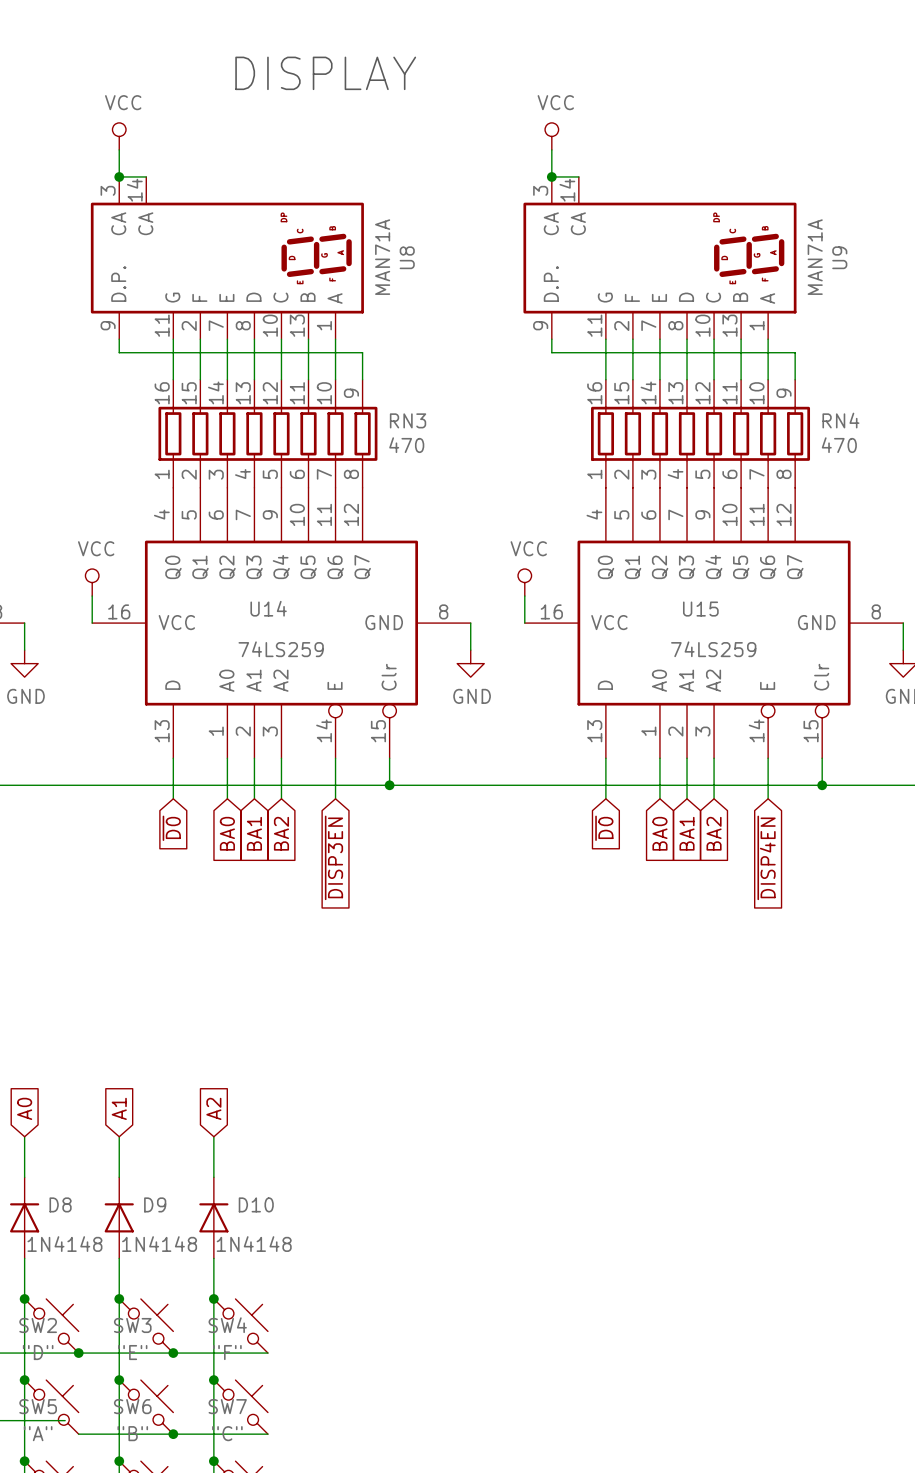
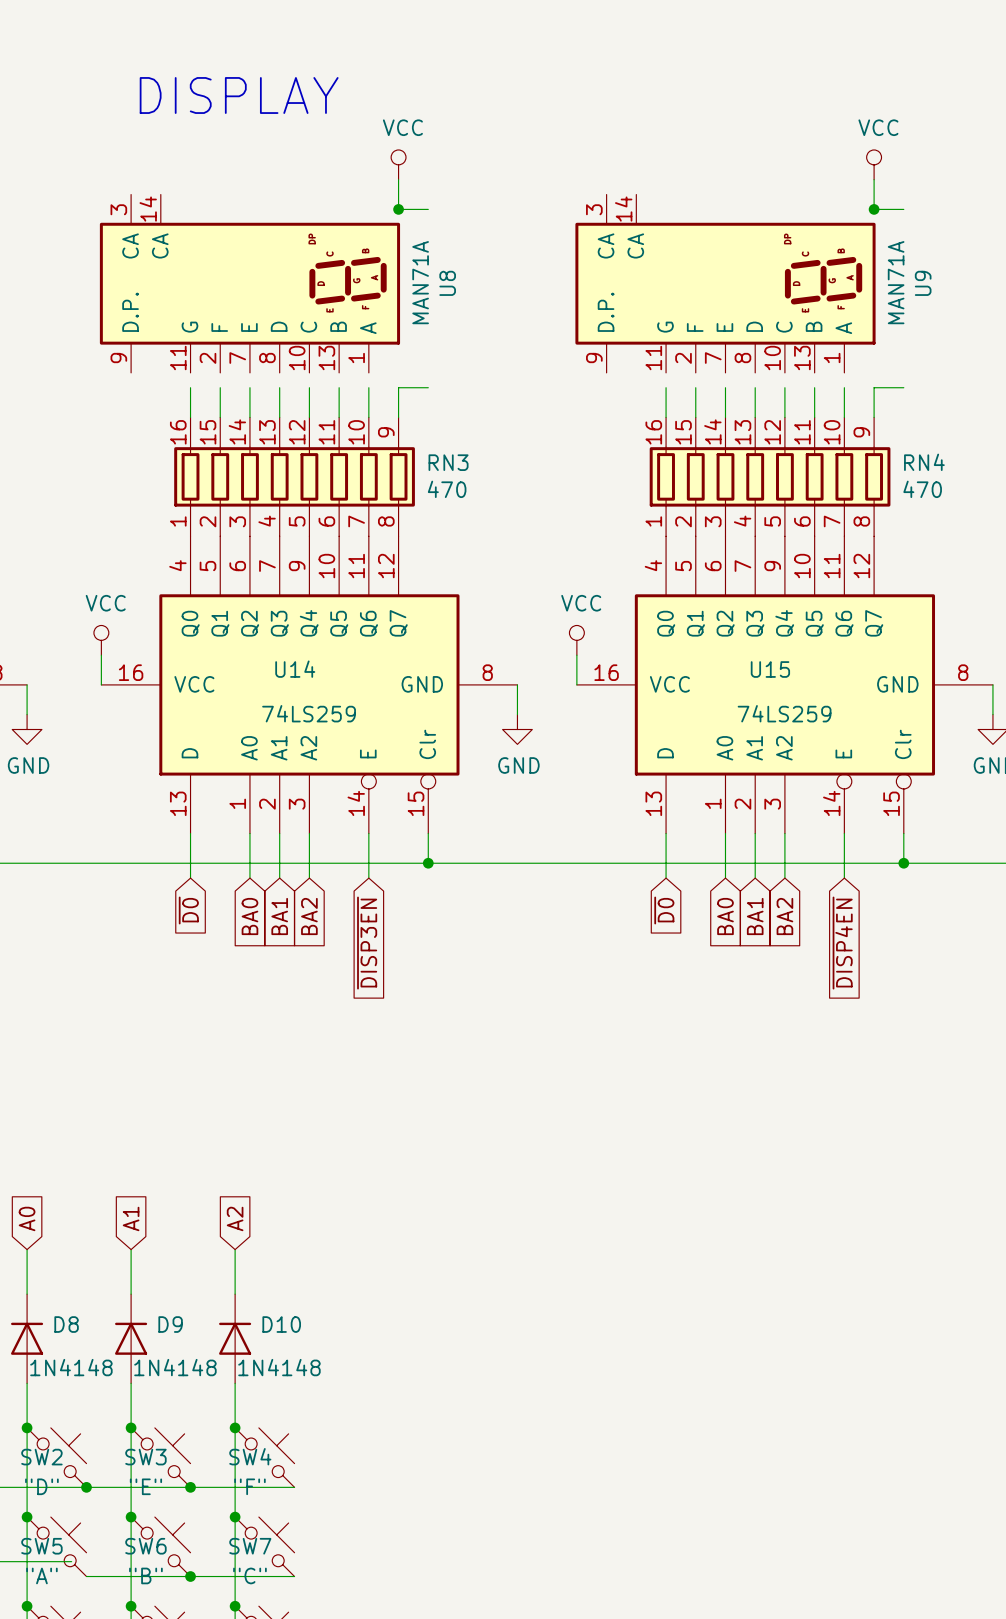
text position: DISPLAY (325, 73) -> DISPLAY (239, 95)
power symbol: VCC (119, 136) -> none
power symbol: VCC (551, 136) -> none
wire: (119, 149) (119, 176) (146, 176) -> (398, 179) (398, 209) (428, 209)
power symbol: none -> VCC (398, 164)
wire: (551, 149) (551, 176) (578, 176) -> (874, 179) (874, 209) (903, 209)
power symbol: none -> VCC (874, 164)
junction: (119, 176) -> none
junction: (551, 176) -> none
junction: none -> (398, 209)
junction: none -> (874, 209)
wire: (119, 339) (119, 352) (362, 352) -> (428, 387) (398, 387)
wire: (173, 339) (173, 352) -> none
wire: (200, 339) (200, 352) -> none
wire: (227, 339) (227, 352) -> none
wire: (254, 339) (254, 352) -> none
wire: (281, 339) (281, 352) -> none
wire: (308, 339) (308, 352) -> none
wire: (335, 339) (335, 352) -> none
wire: (551, 339) (551, 352) (795, 352) -> (903, 387) (874, 387)
wire: (605, 339) (605, 352) -> none
wire: (632, 339) (632, 352) -> none
wire: (659, 339) (659, 352) -> none
wire: (687, 339) (687, 352) -> none
wire: (714, 339) (714, 352) -> none
wire: (741, 339) (741, 352) -> none
wire: (768, 339) (768, 352) -> none

